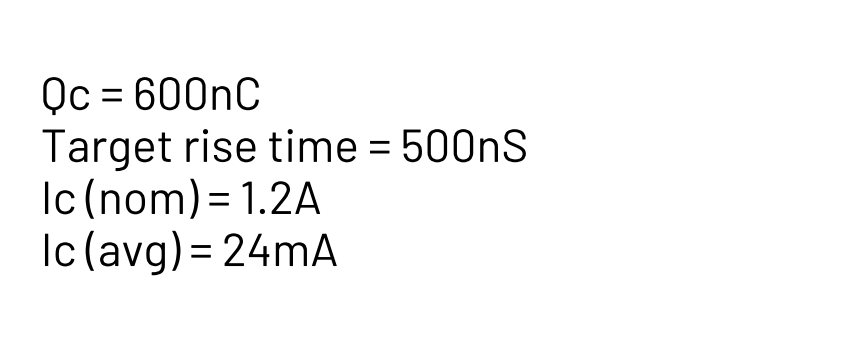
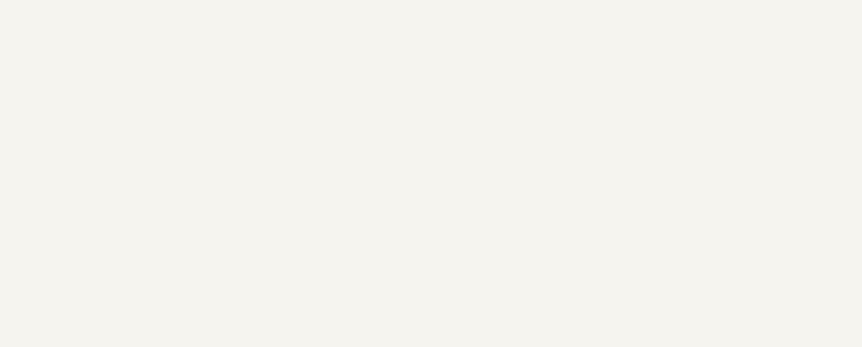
text: Qc = 600nC (151, 96) -> none
text: Target rise time = 500nS (284, 150) -> none
text: Ic (nom) = 1.2A (182, 198) -> none
text: Ic (avg) = 24mA (190, 253) -> none

